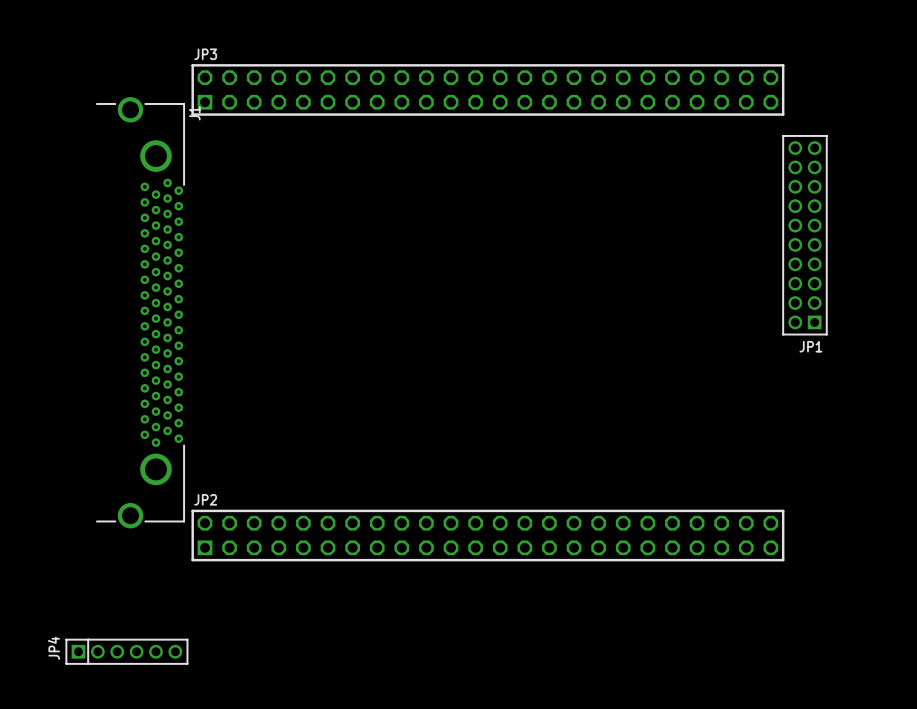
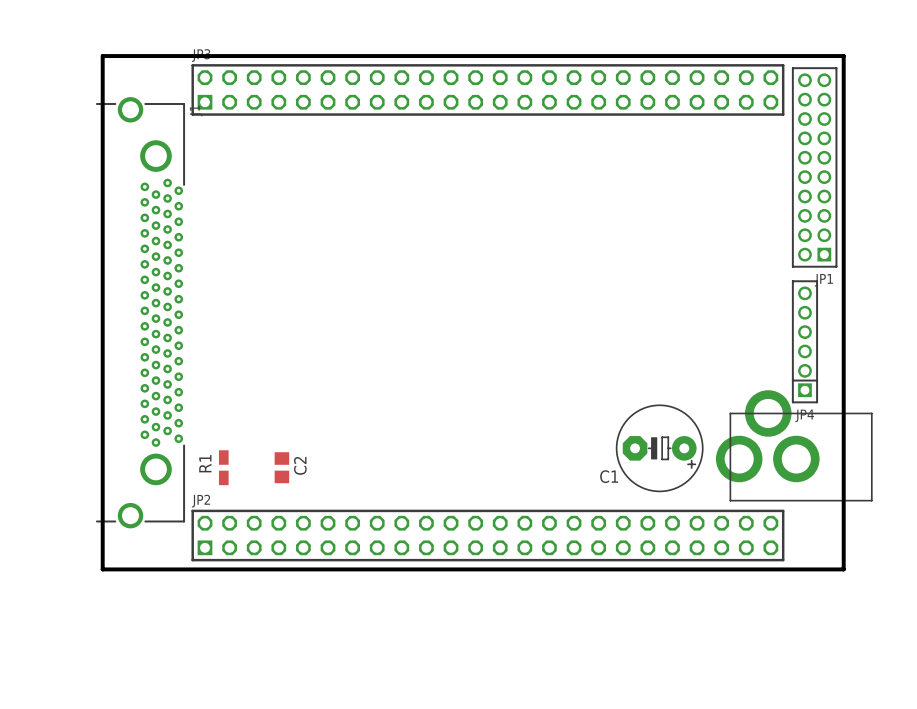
board edge: none -> (102, 56) (843, 56) (843, 569) (102, 569) (102, 56)
JP1 position: (804, 235) -> (814, 167)
part: none -> (794, 445)
C1: none -> (659, 448)
R1: none -> (223, 467)
C2: none -> (281, 467)
JP4 rotation: 0° (126, 651) -> 90° counterclockwise (804, 341)
JP4 position: (126, 651) -> (804, 341)

